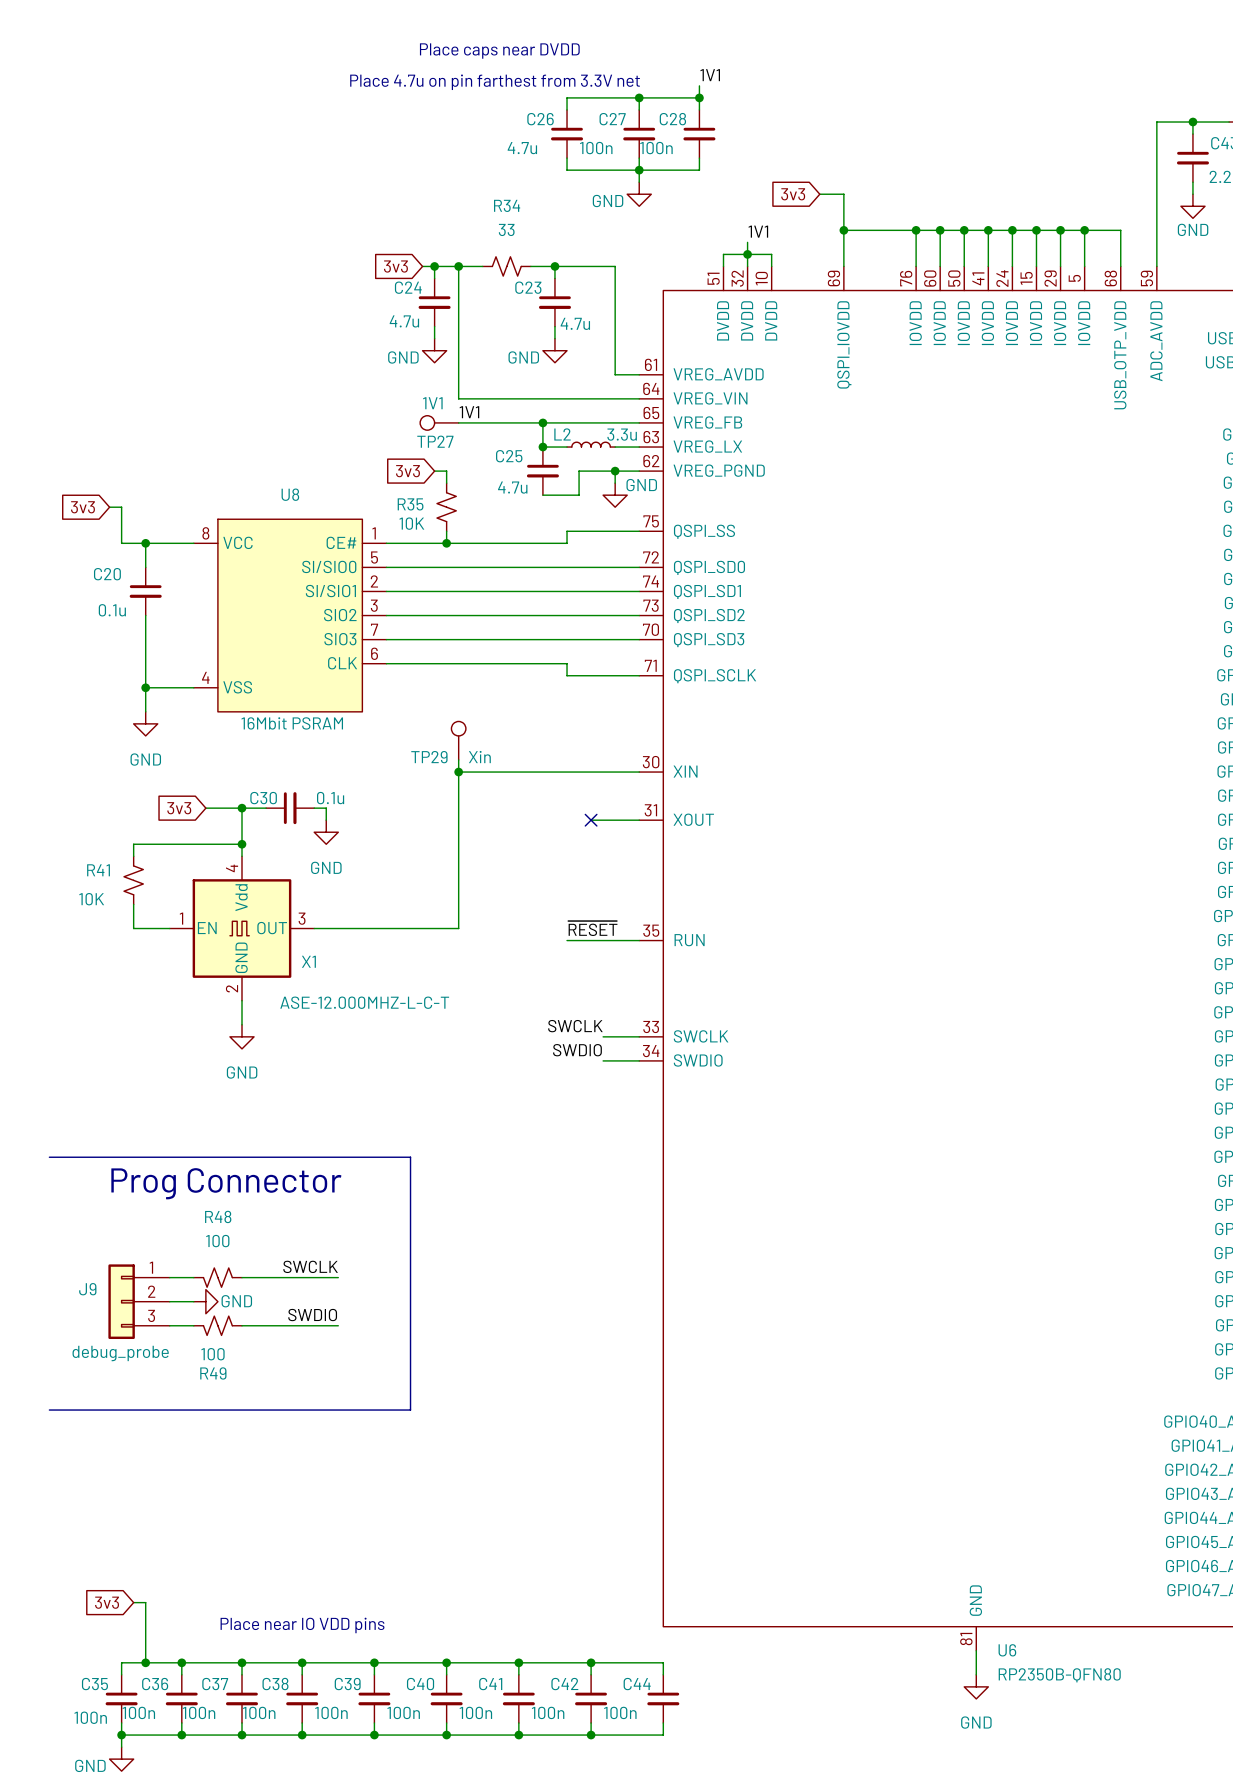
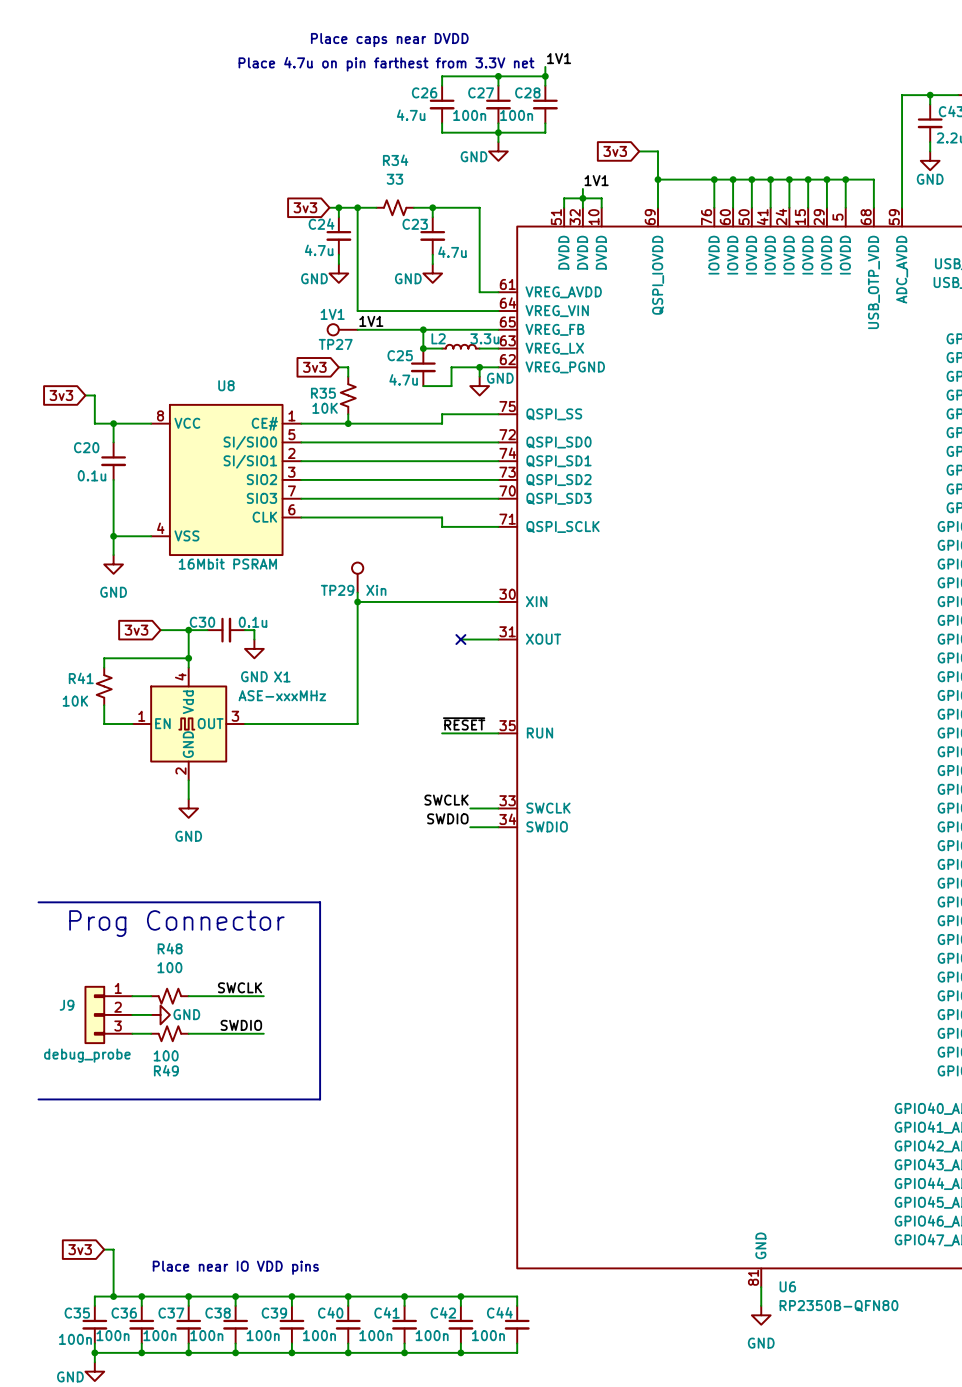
X1 name position: X1 (308, 961) -> X1 (282, 676)
X1 value: ASE-12.000MHZ-L-C-T (364, 1002) -> ASE-xxxMHz (282, 695)

